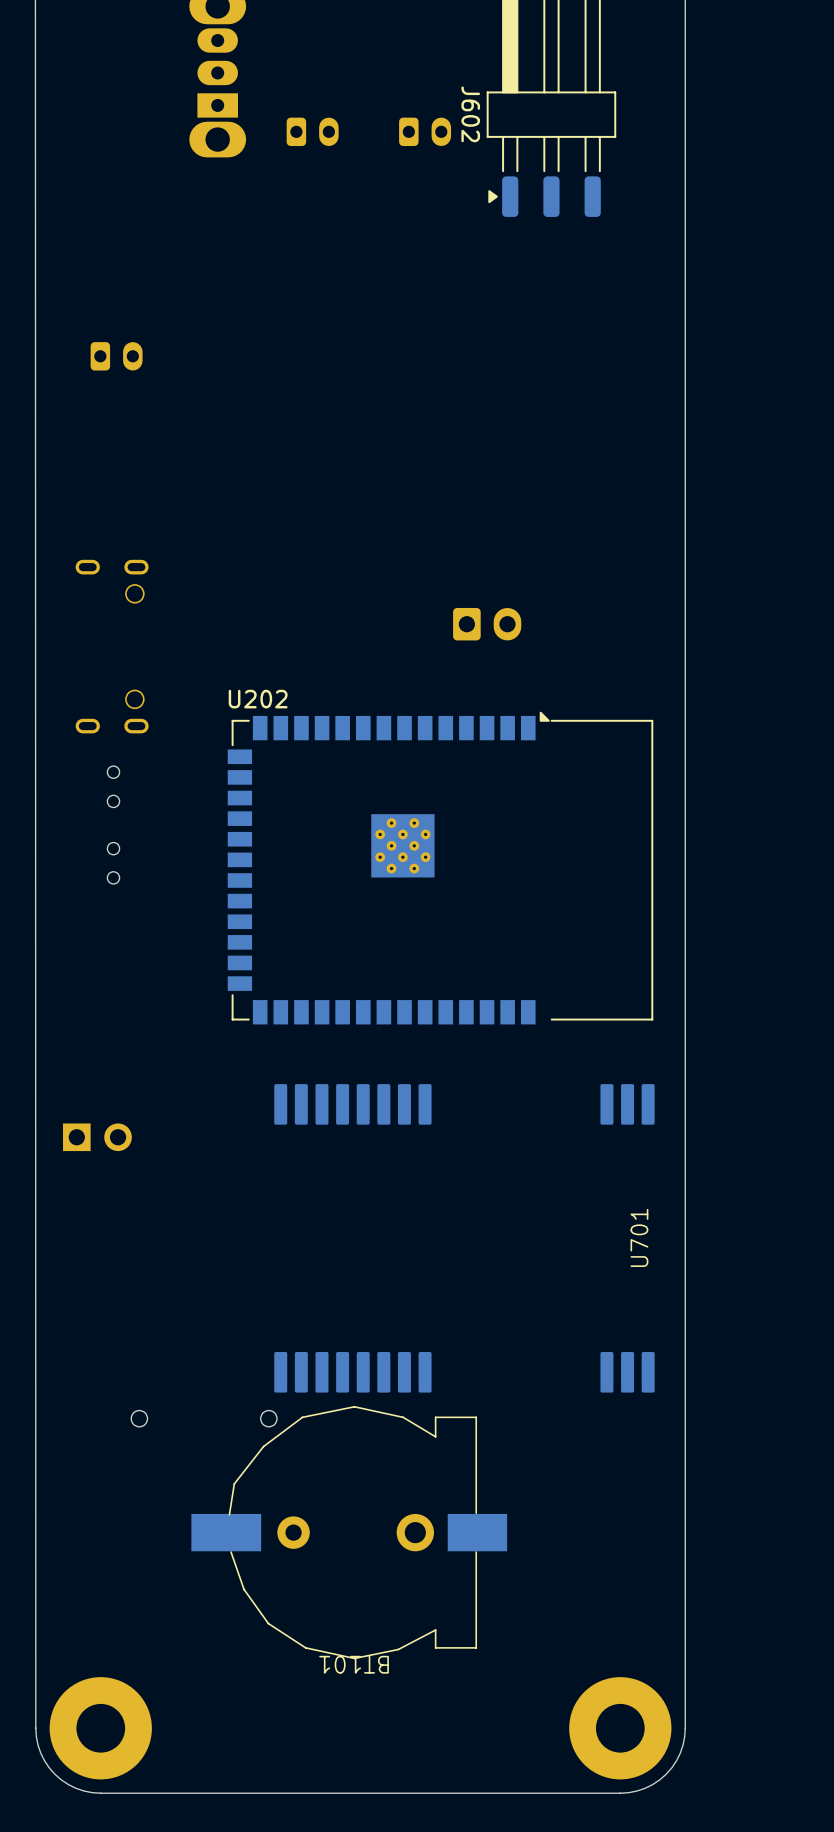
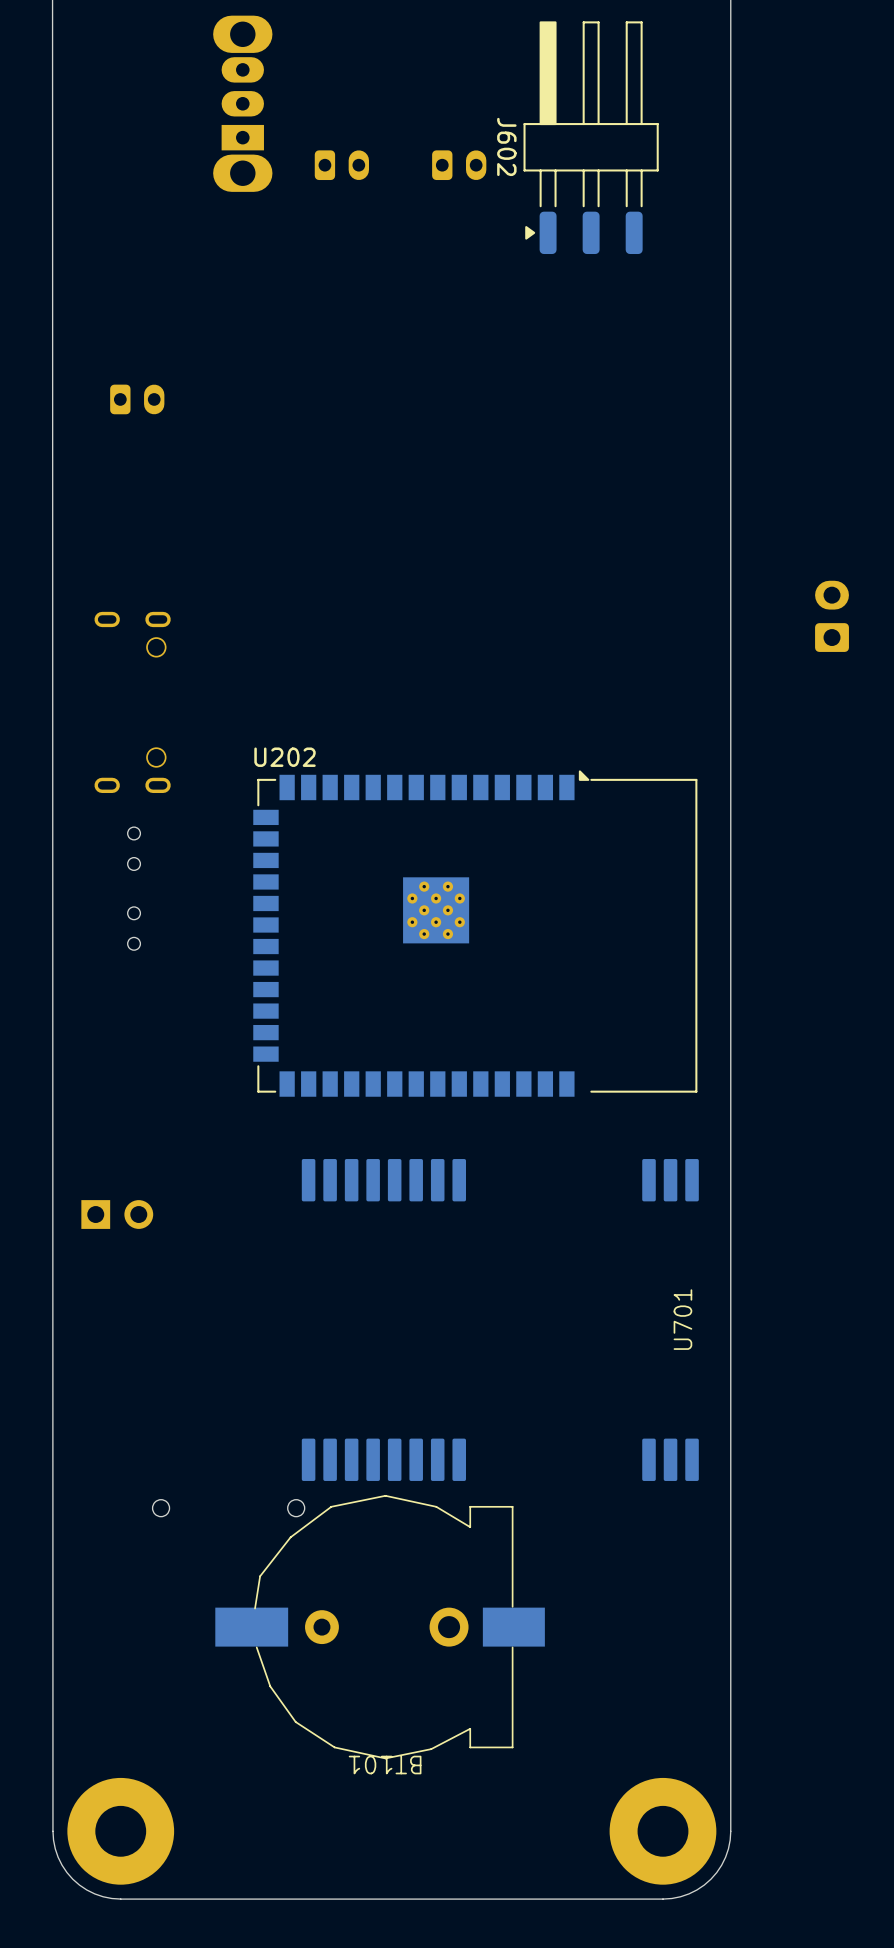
part rotation: 0° (487, 624) -> 90° counterclockwise (832, 616)
part position: (487, 624) -> (832, 616)

